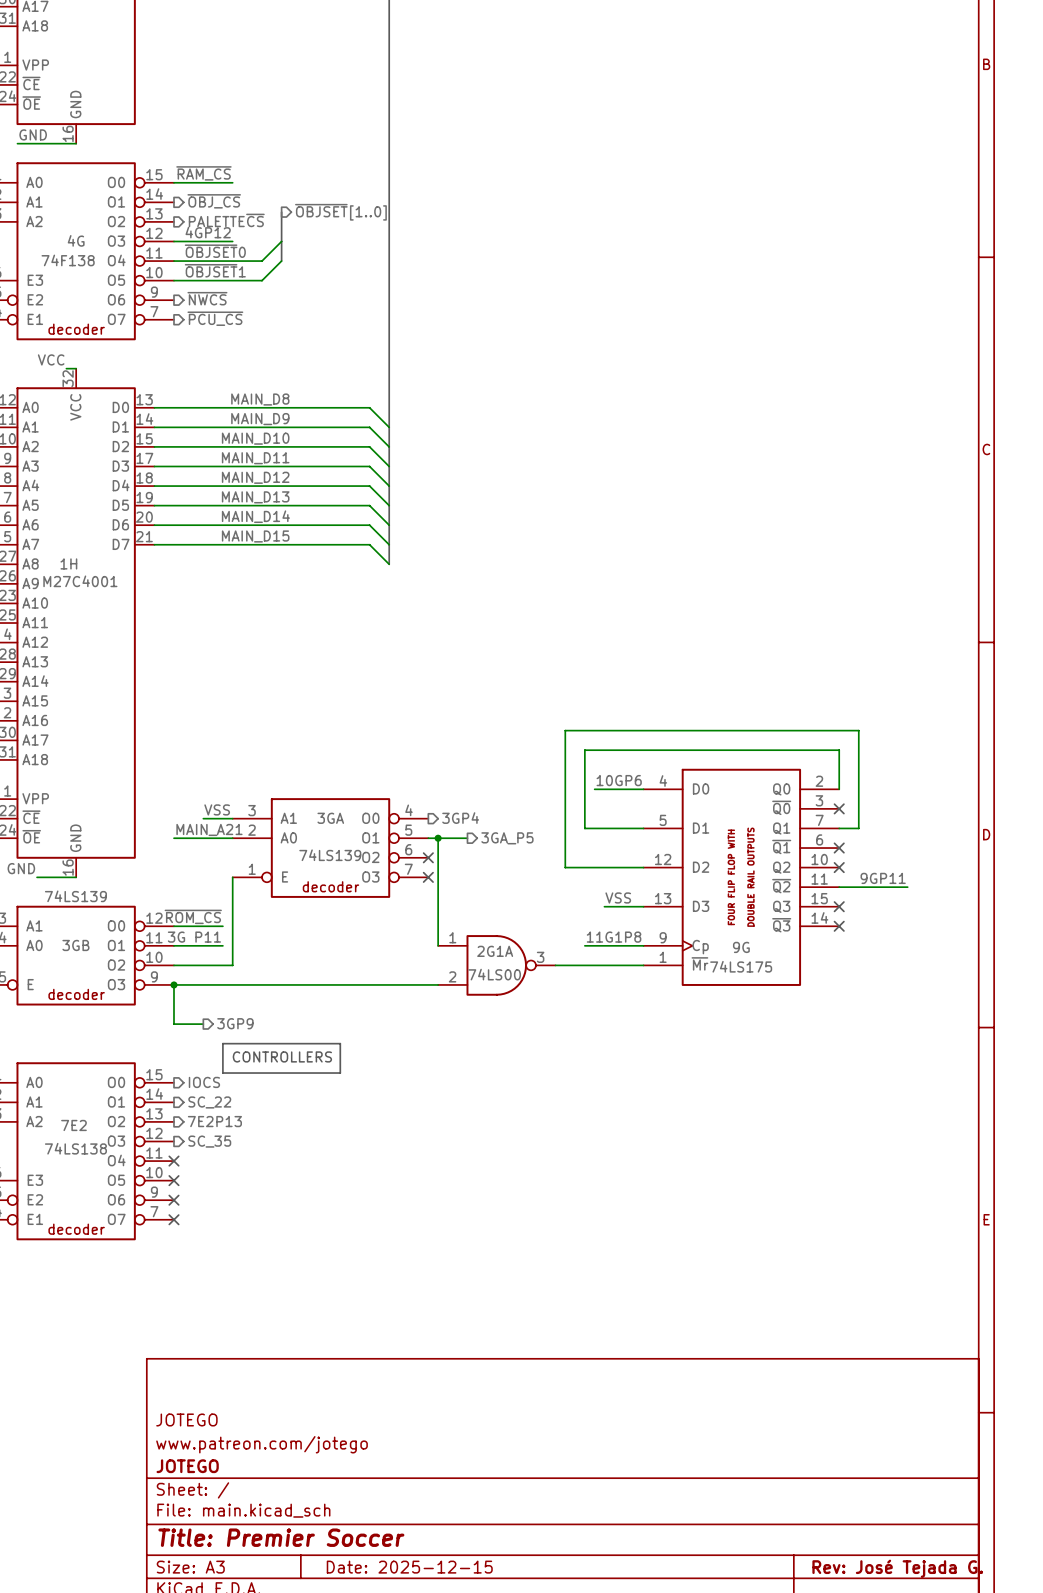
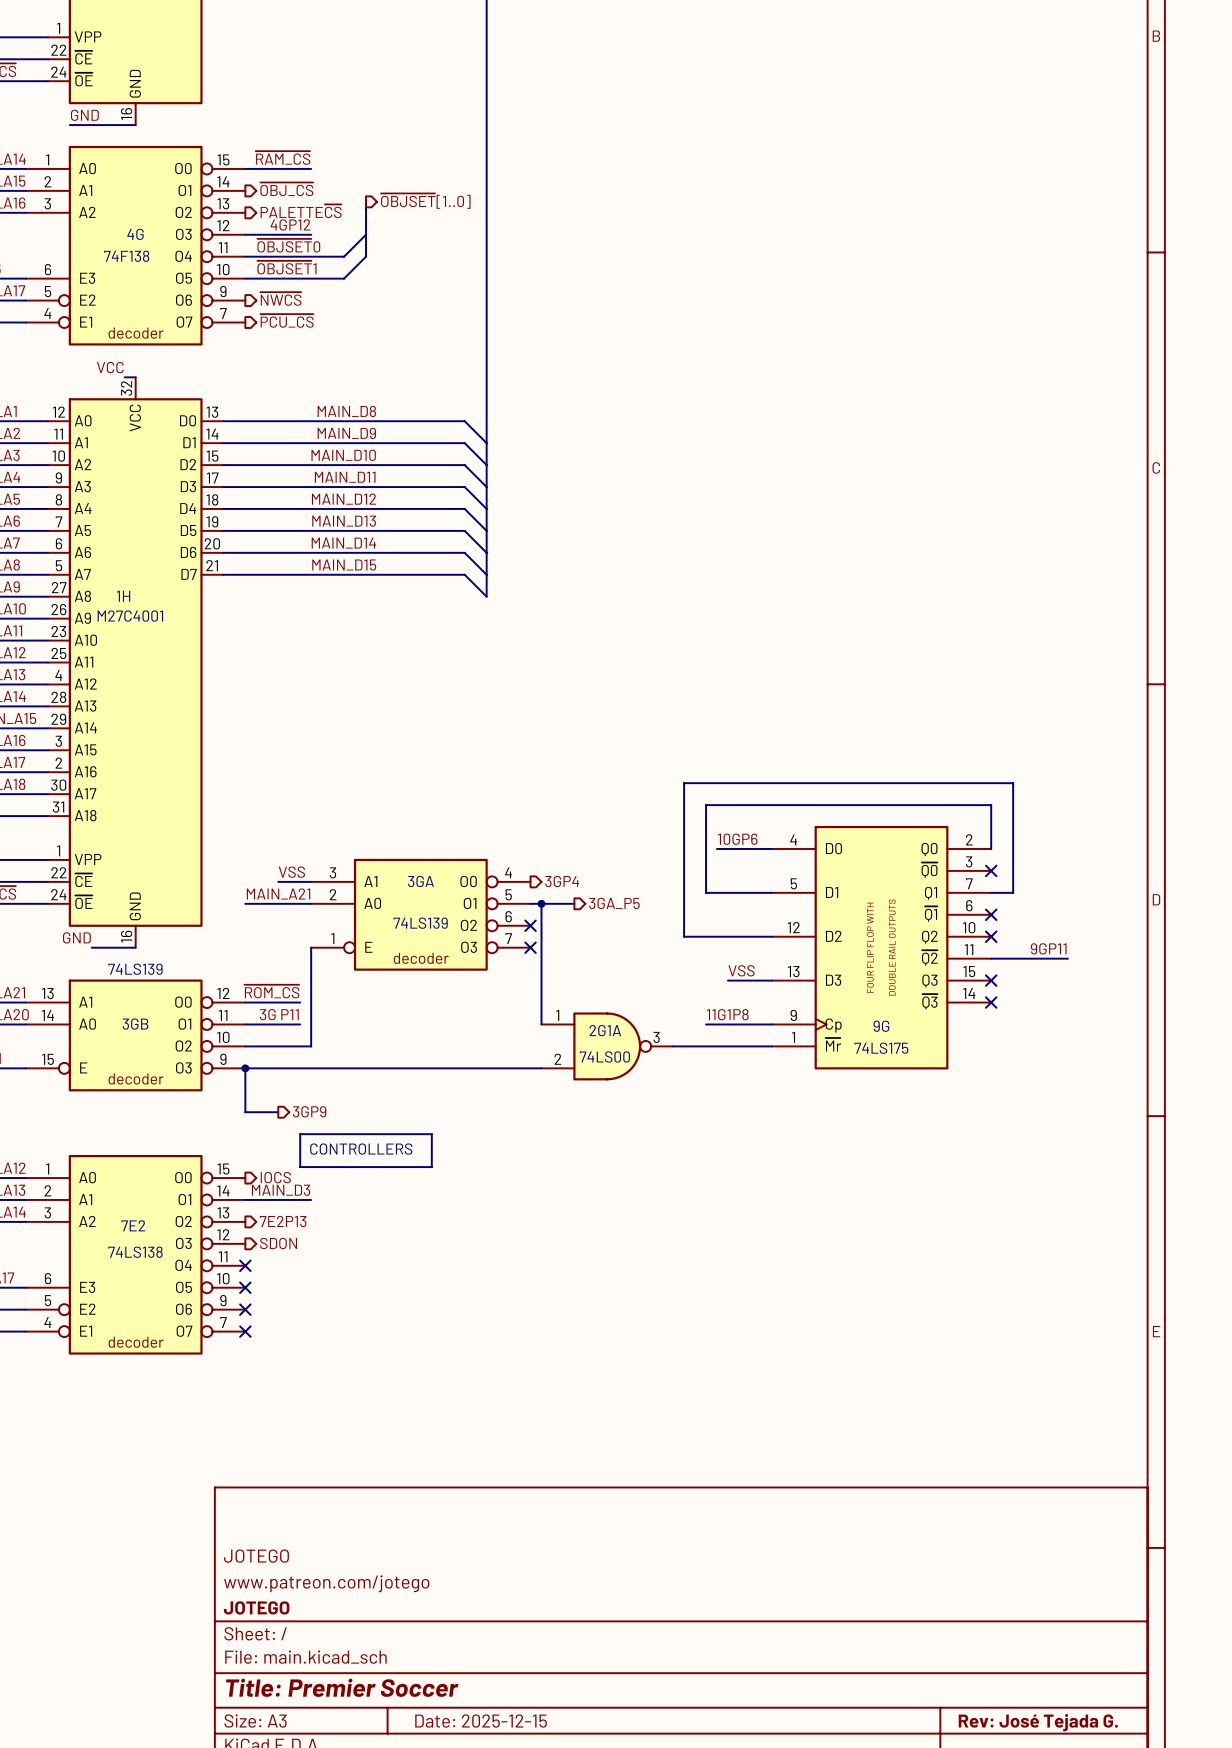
label: none -> MAIN_D3 (281, 1190)
wire: none -> (245, 1199) (311, 1199)
hierarchical label: SC_22 (209, 1102) -> none
hierarchical label: SC_35 (209, 1141) -> SDON (278, 1243)

